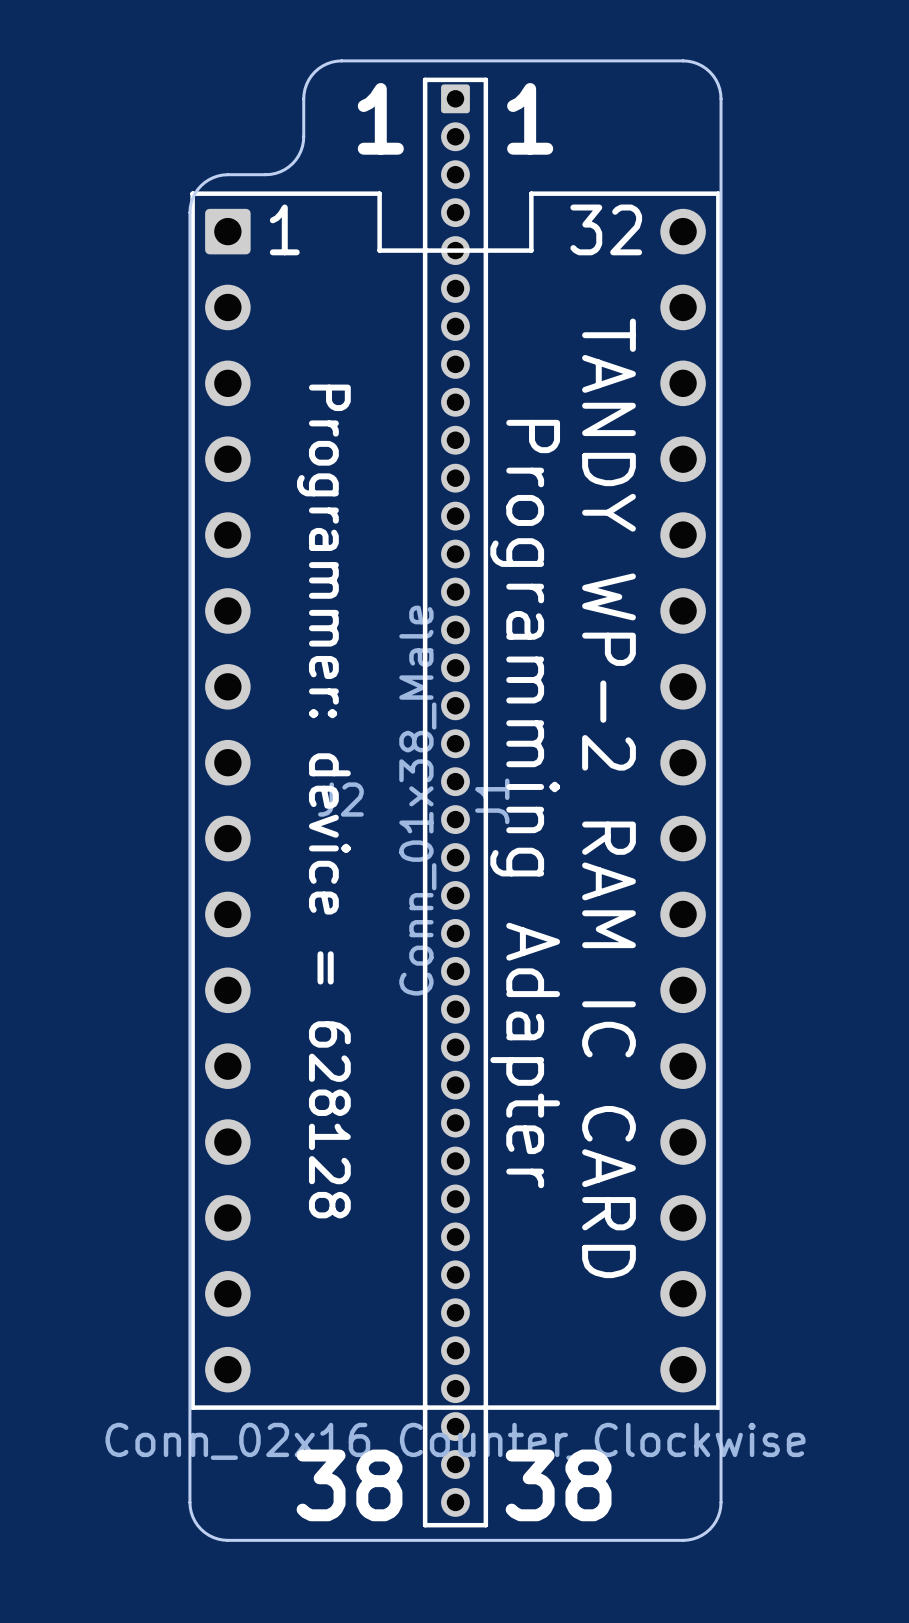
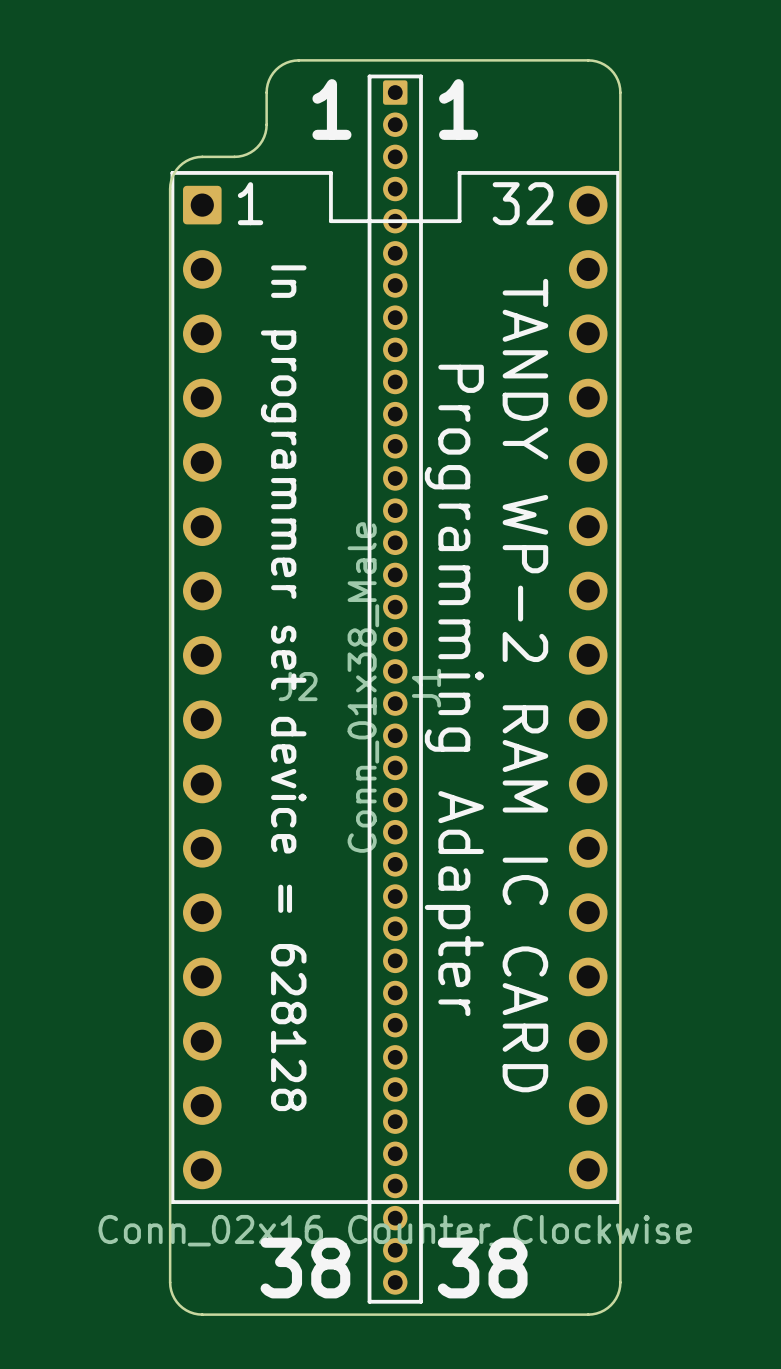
text: Programmer: device = 628128 (323, 801) -> In programmer set device = 628128 (283, 688)

